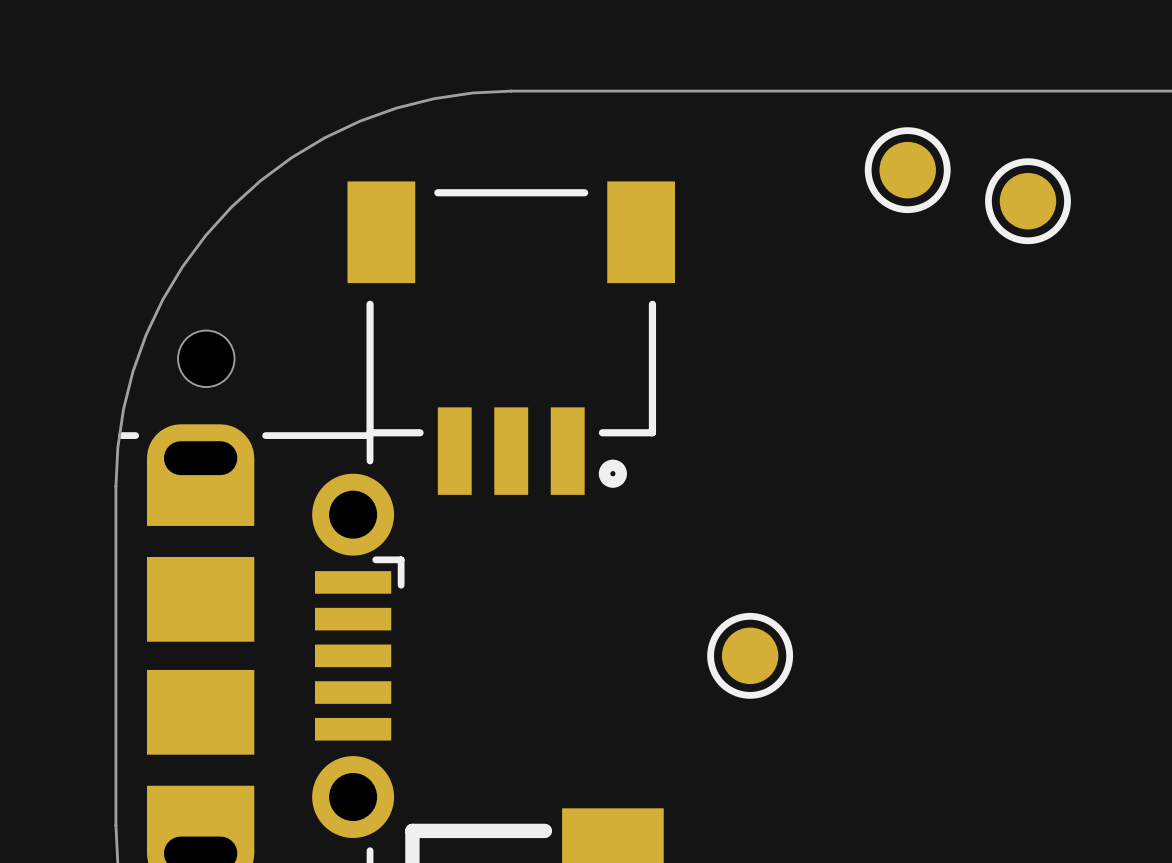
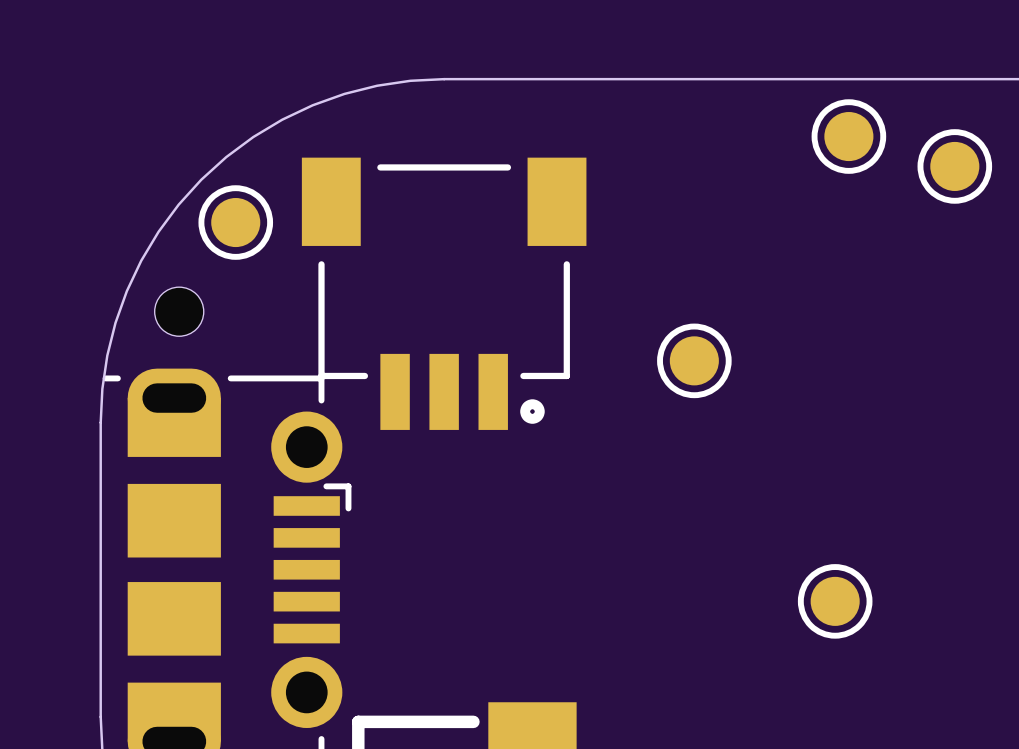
part: none -> (848, 136)
part: (907, 170) -> none
part: none -> (954, 166)
part: (1027, 201) -> none
part: none -> (235, 222)
part: none -> (694, 360)
part: (750, 655) -> none
part: none -> (835, 601)

